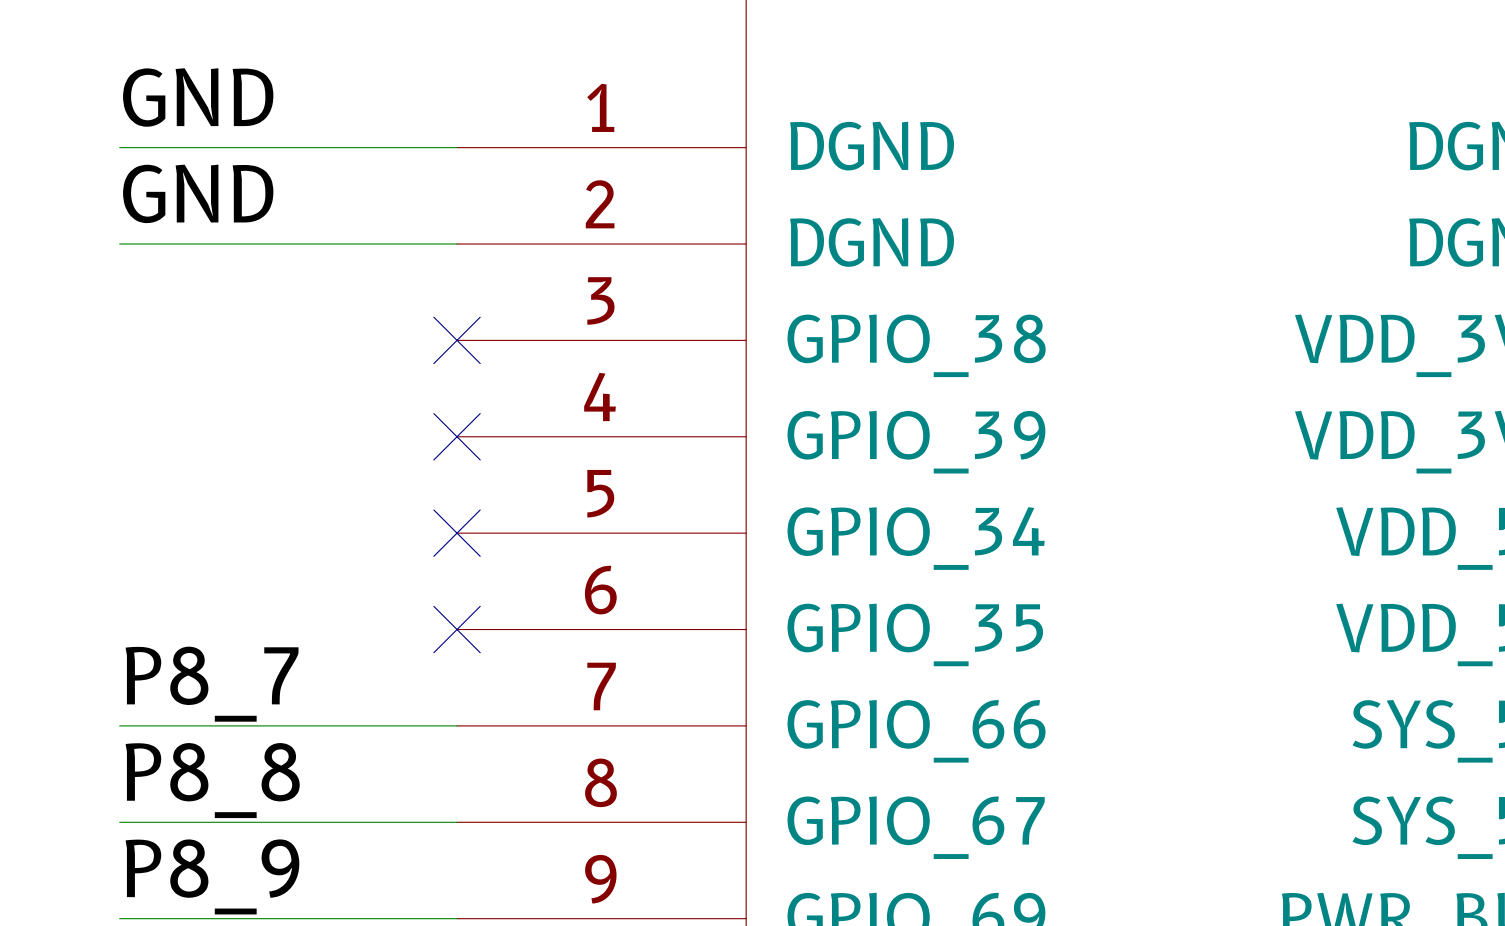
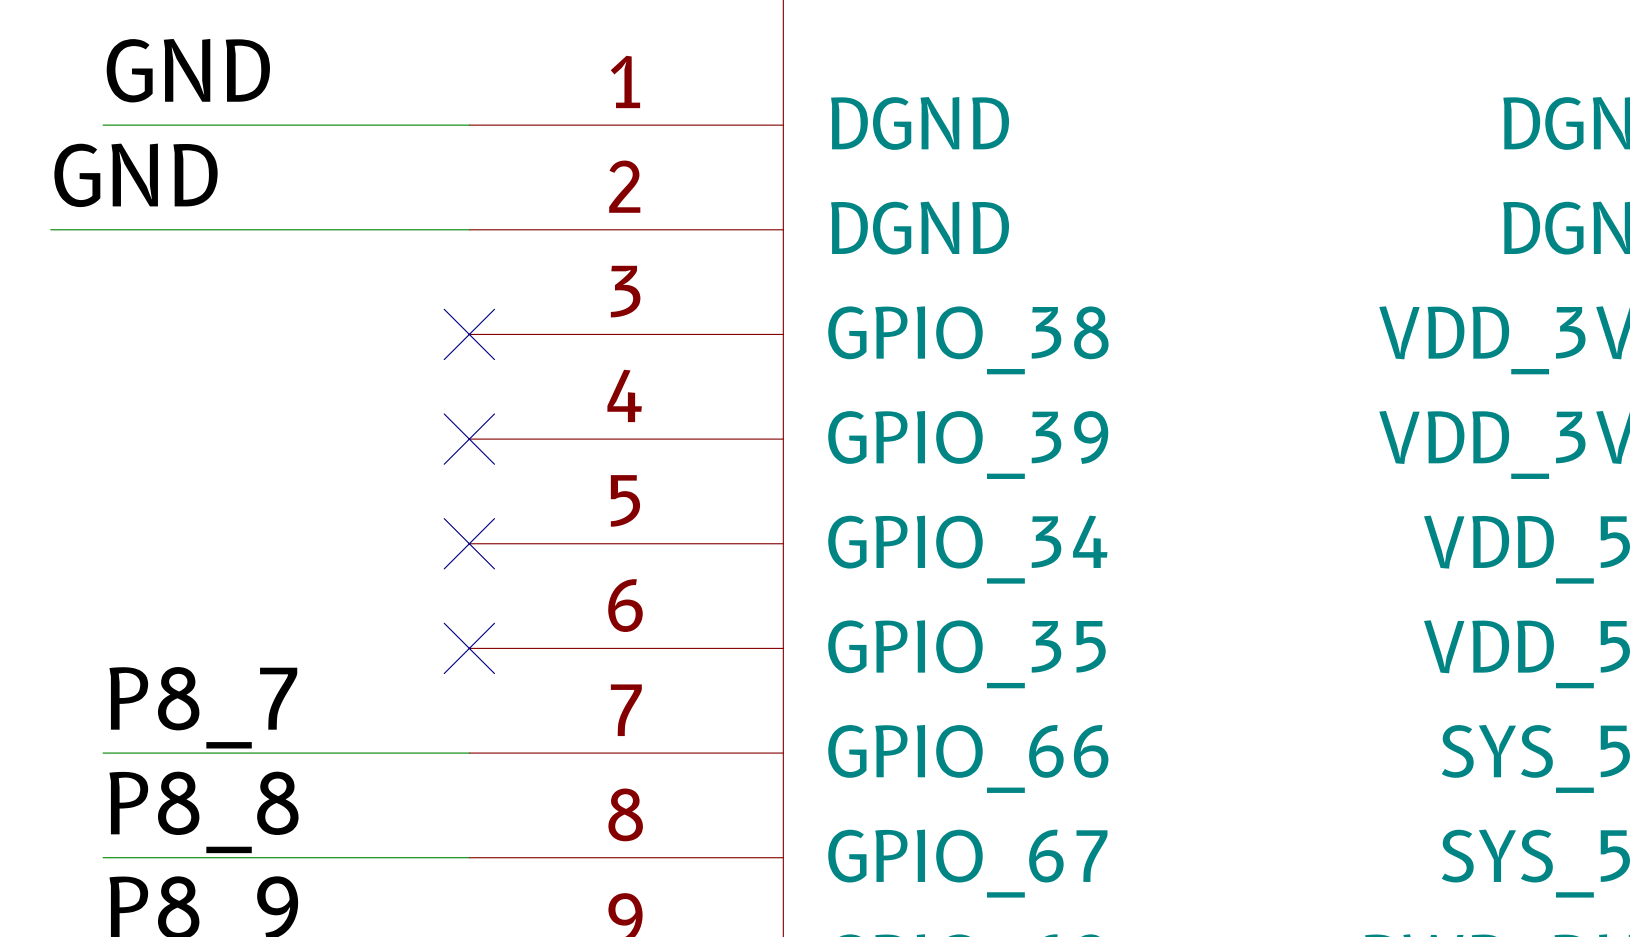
label position: GND (198, 193) -> GND (136, 175)
wire: none -> (50, 229) (103, 229)

